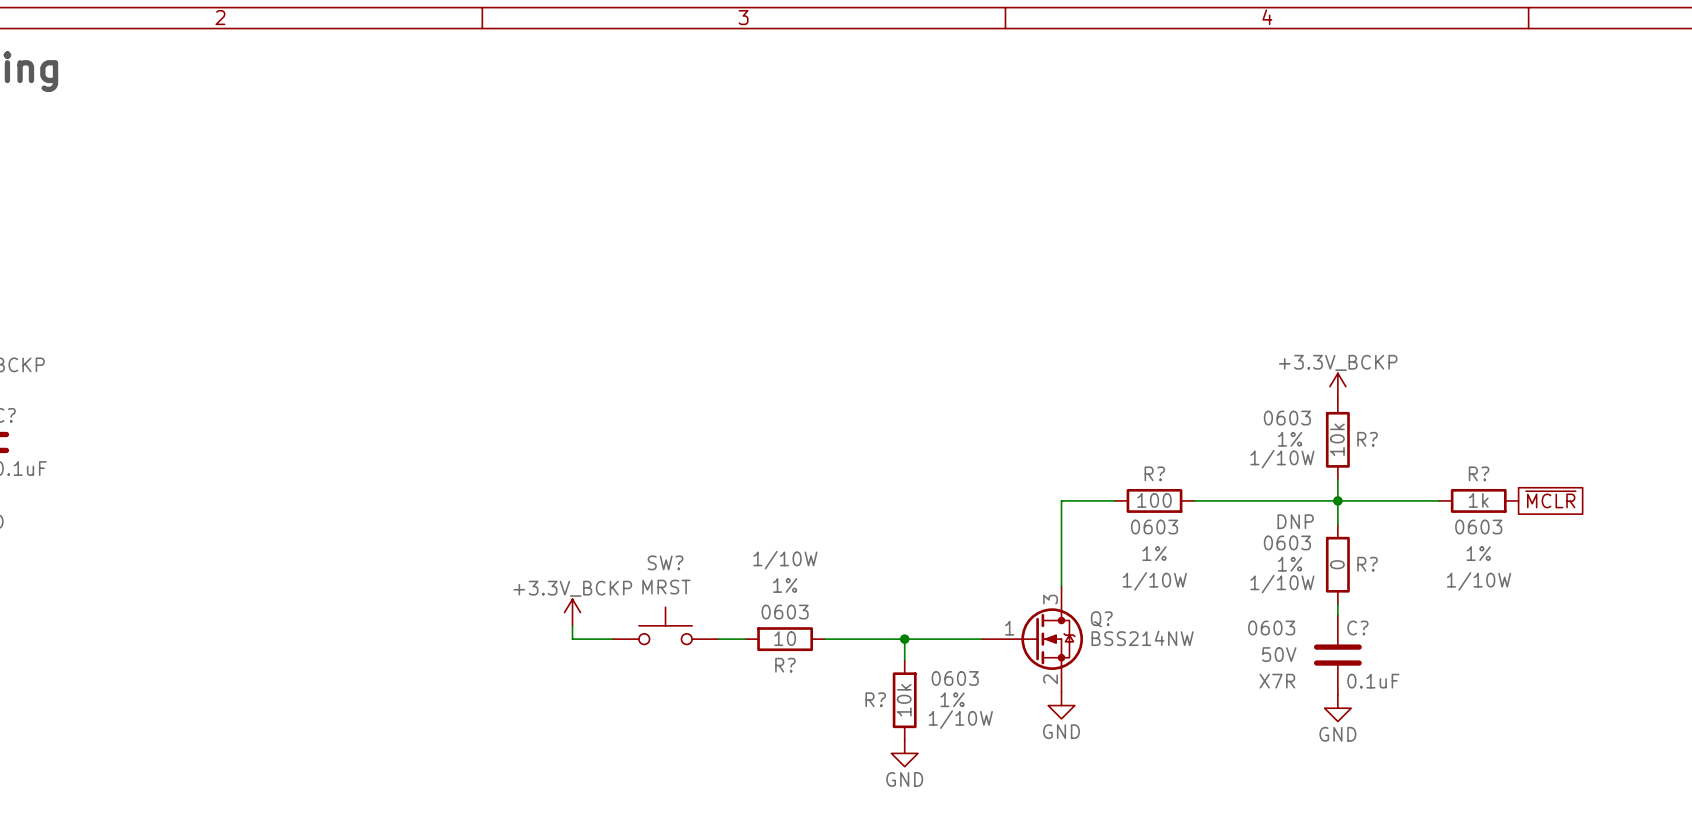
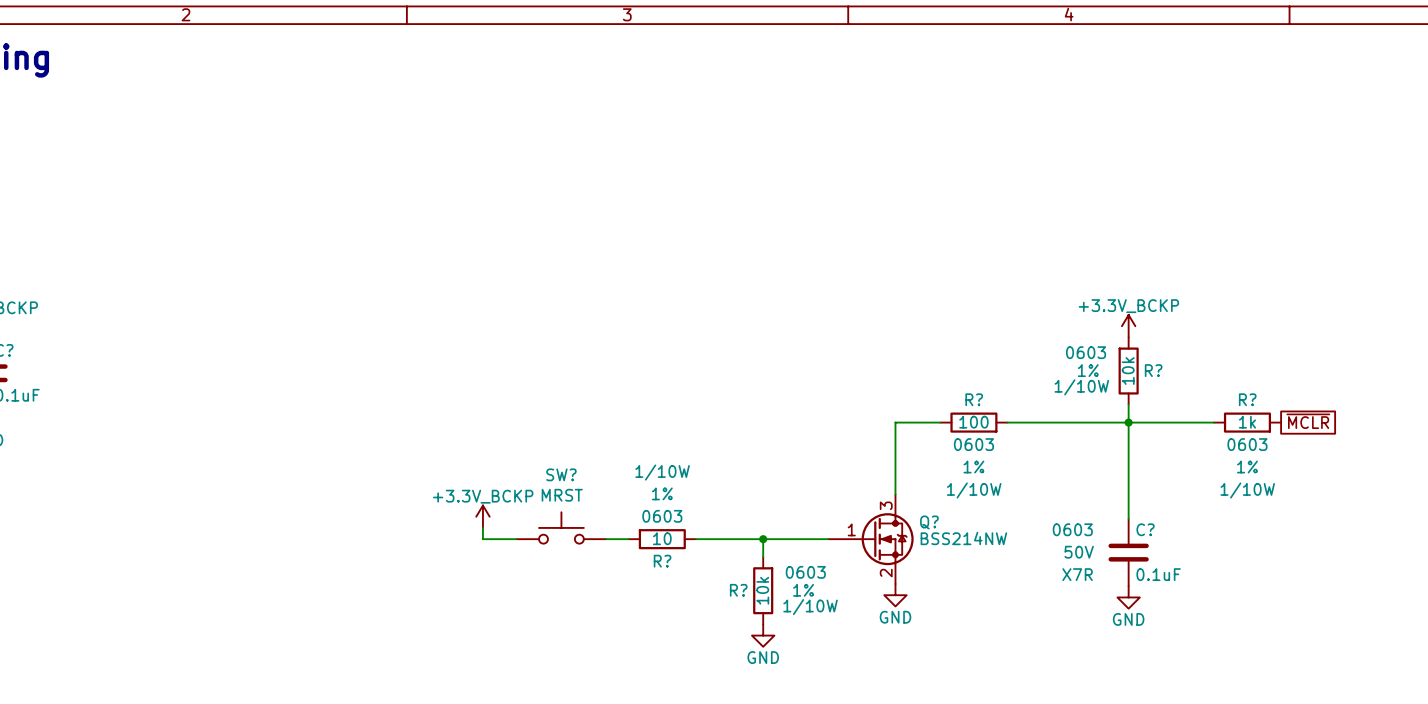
wire: none -> (1128, 442) (1128, 510)
R?: 0 (1337, 564) -> none

